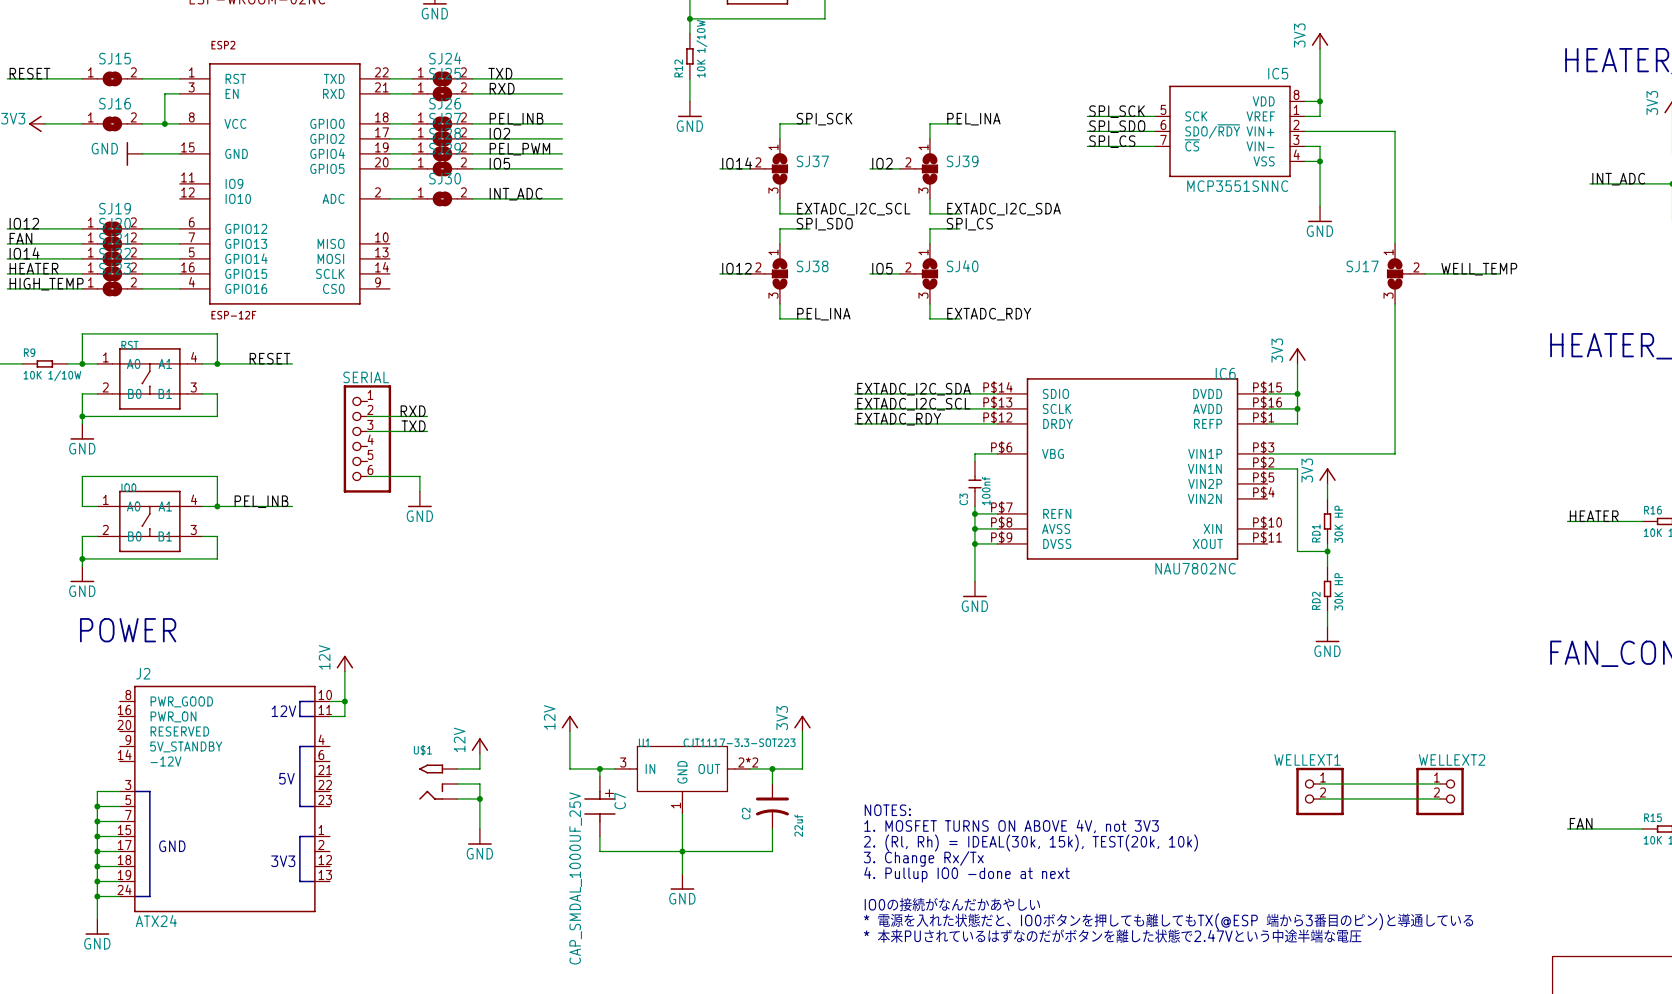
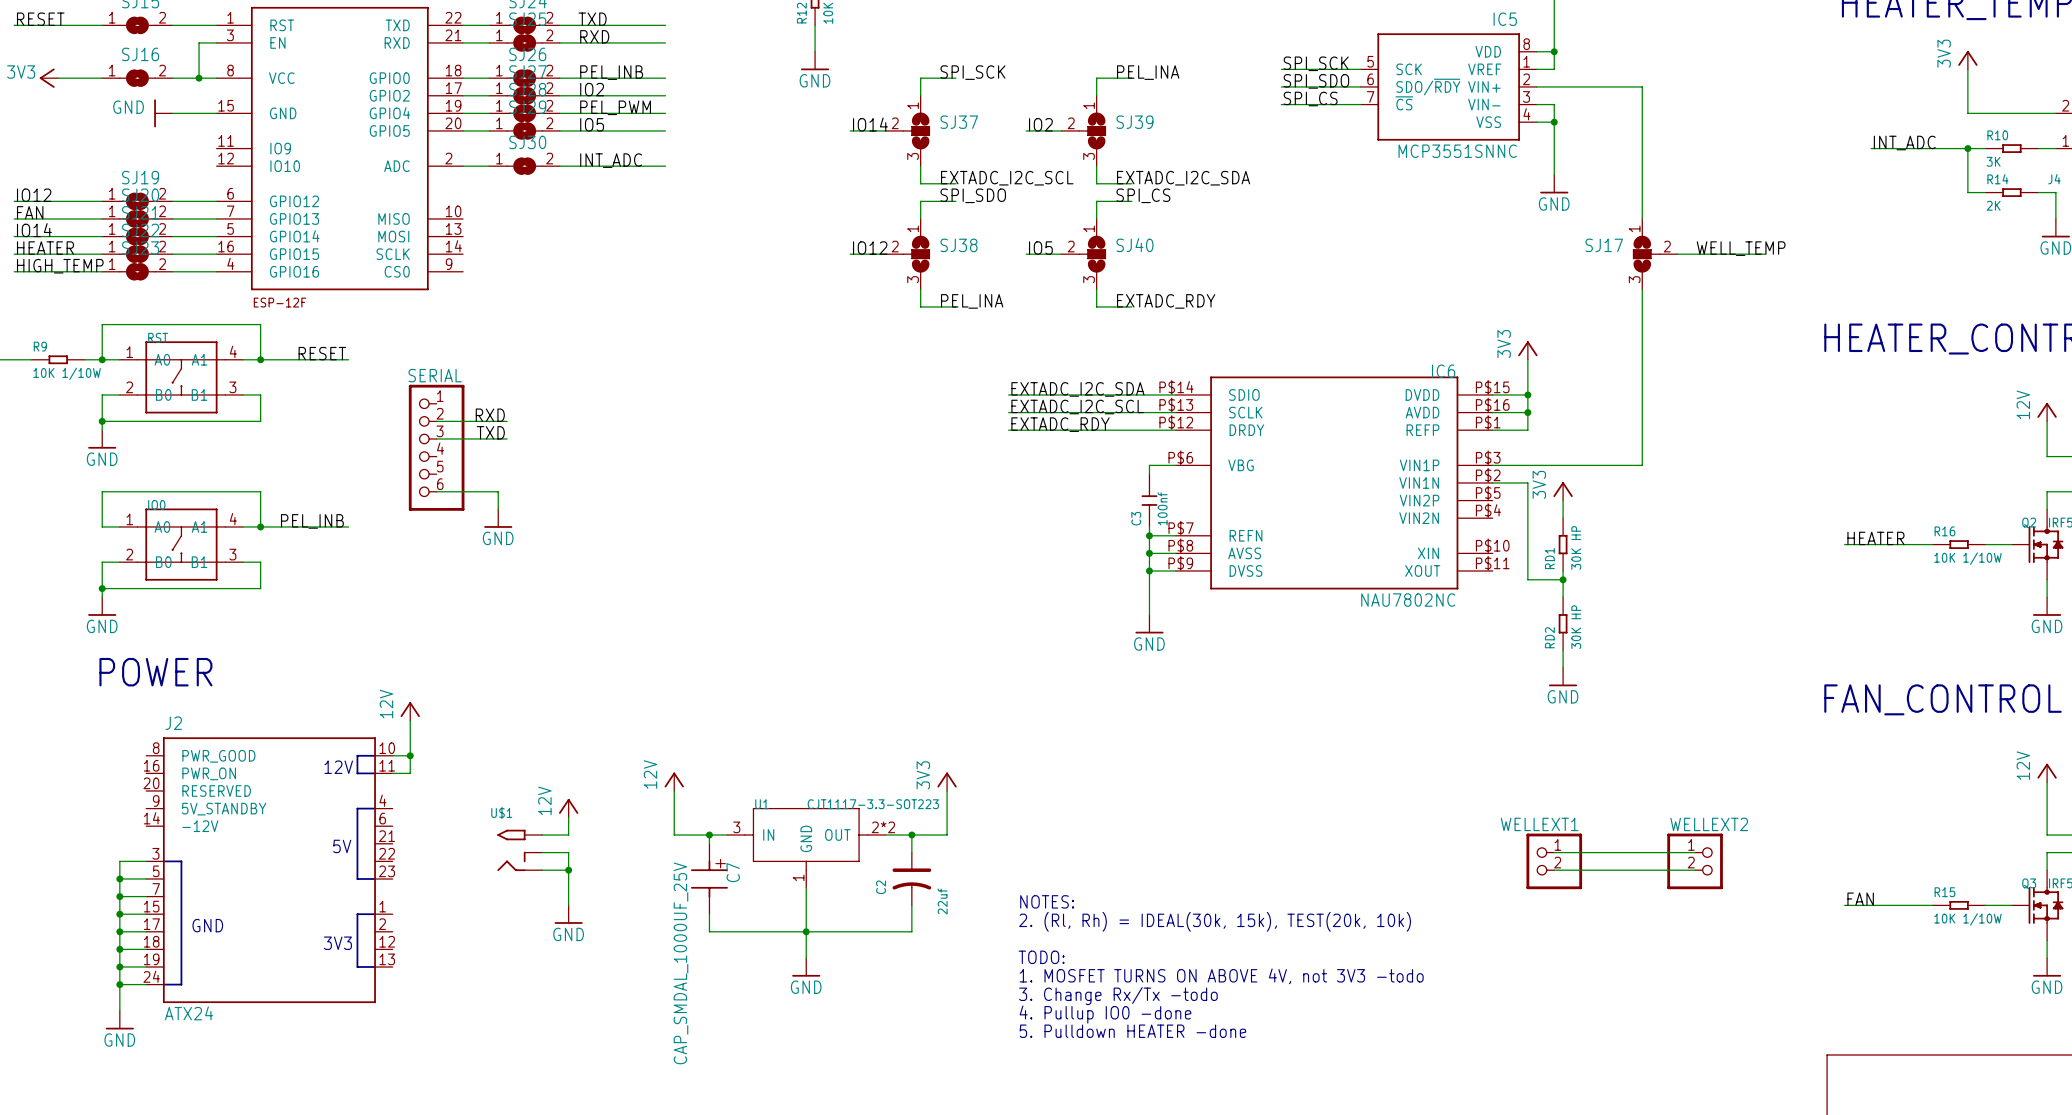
text: NOTES: (887, 810) -> none
text: 1. MOSFET TURNS ON ABOVE 4V, not 3V3 (1011, 826) -> NOTES: (1047, 901)
text: 3. Change Rx/Tx (923, 859) -> none
text: 4. Pullup IO0 -done at next (966, 874) -> TODO: (1041, 957)
text: none -> 1. MOSFET TURNS ON ABOVE 4V, not 3V3 -todo (1221, 976)
text: IO0の接続がなんだかあやしい (952, 904) -> 3. Change Rx/Tx -todo (1118, 996)
text: * 電源を入れた状態だと、IO0ボタンを押しても離してもTX(@ESP 端から3番目のピン)と導通している (1168, 921) -> 4. Pullup IO0 -done (1105, 1014)
text: * 本来PUされているはずなのだがボタンを離した状態で2.47Vという中途半端な電圧 (1112, 936) -> 5. Pulldown HEATER -done (1132, 1031)

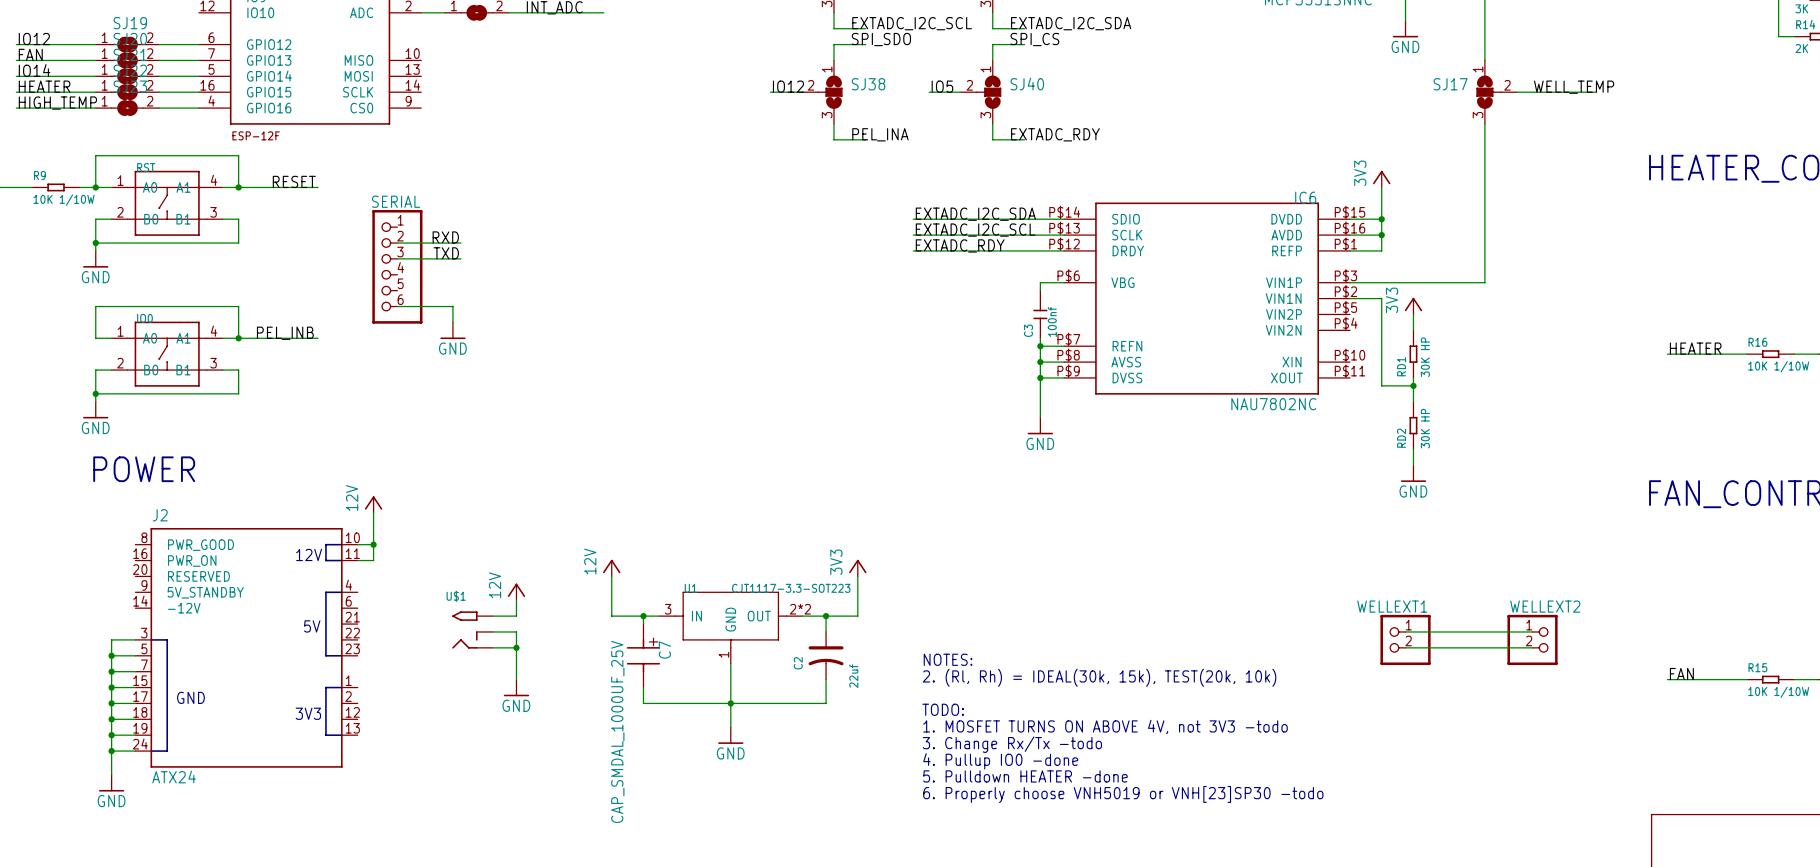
text: none -> NOTES: (948, 659)
text: NOTES: (1047, 901) -> 2. (Rl, Rh) = IDEAL(30k, 15k), TEST(20k, 10k) (1099, 677)
text: 2. (Rl, Rh) = IDEAL(30k, 15k), TEST(20k, 10k) (1215, 921) -> none
text: none -> TODO: (943, 709)
text: TODO: (1041, 957) -> 1. MOSFET TURNS ON ABOVE 4V, not 3V3 -todo (1105, 726)
text: 1. MOSFET TURNS ON ABOVE 4V, not 3V3 -todo (1221, 976) -> 3. Change Rx/Tx -todo (1012, 744)
text: 3. Change Rx/Tx -todo (1118, 996) -> 4. Pullup IO0 -done (1000, 761)
text: 4. Pullup IO0 -done (1105, 1014) -> 5. Pulldown HEATER -done (1025, 776)
text: 5. Pulldown HEATER -done (1132, 1031) -> 6. Properly choose VNH5019 or VNH[23]SP30 -todo (1123, 794)

